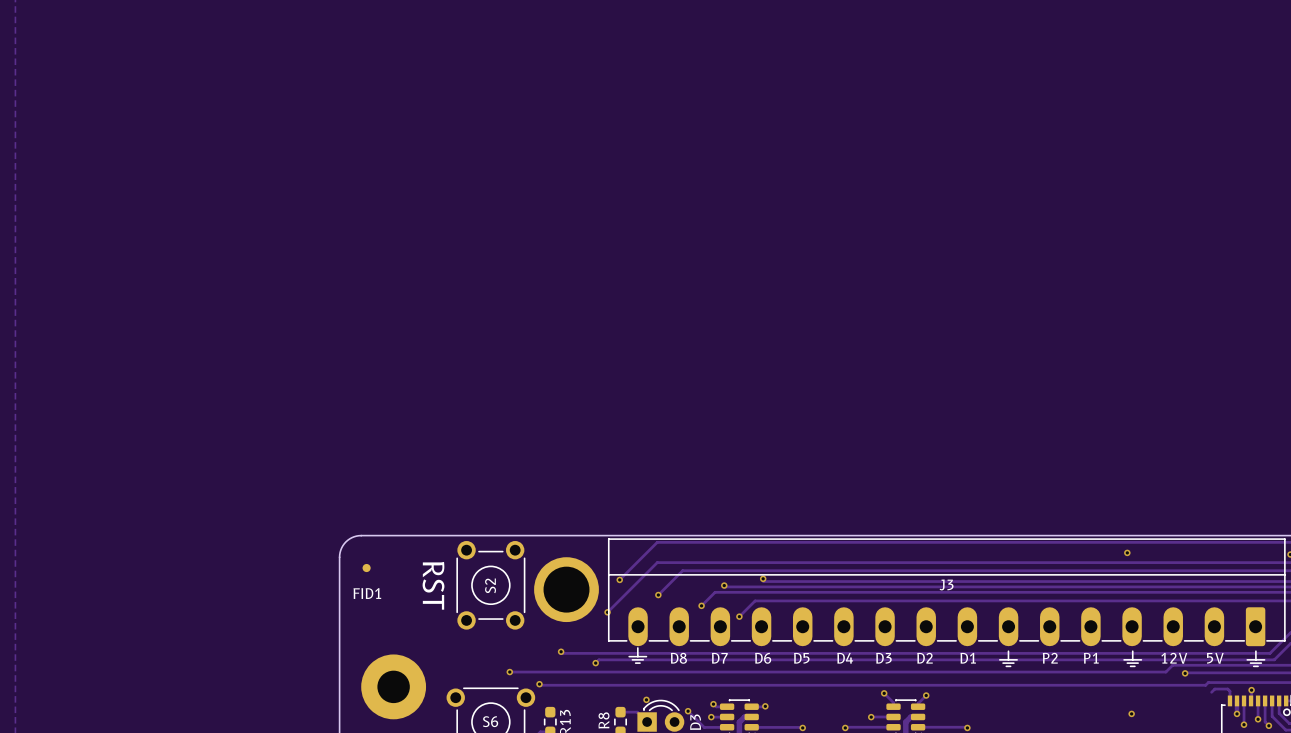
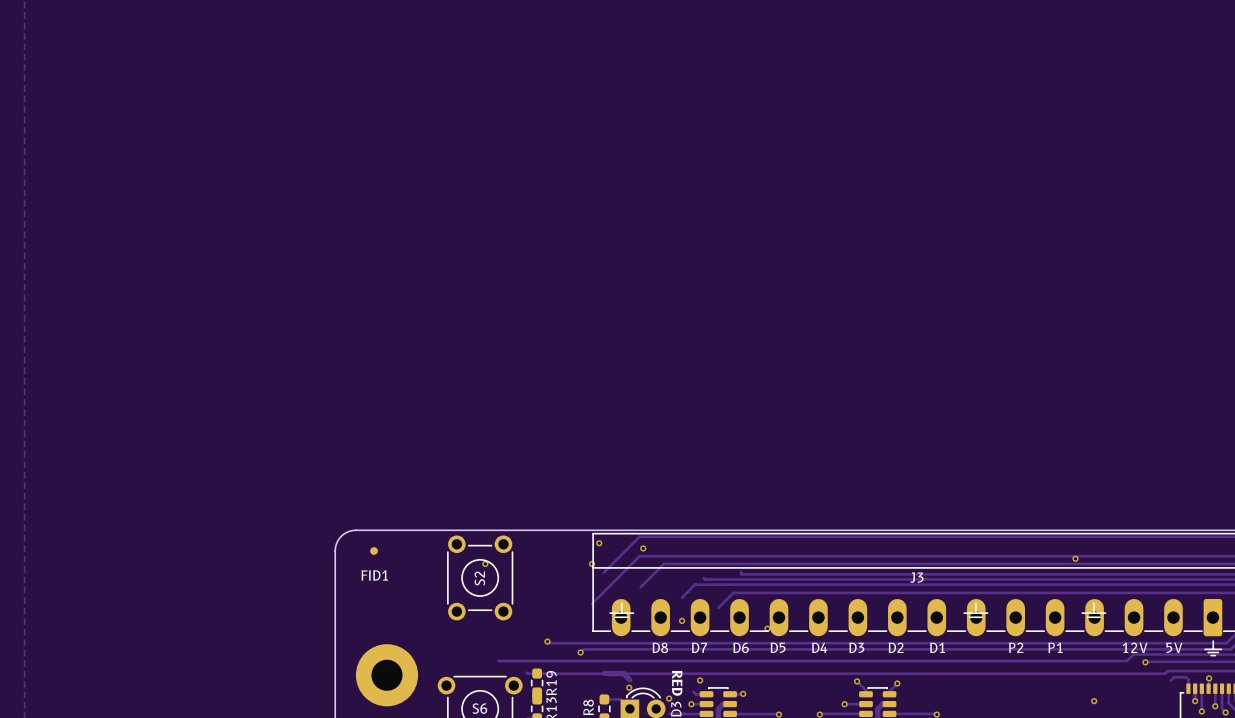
via: none -> (599, 543)
via position: (1127, 552) -> (1075, 558)
via: none -> (643, 548)
FID1 position: (366, 568) -> (374, 551)
via: none -> (485, 563)
via: (763, 578) -> none
via position: (619, 579) -> (592, 563)
text: RST (433, 585) -> none
via: (724, 585) -> none
part: (566, 589) -> none
via: (658, 595) -> none
via: (701, 605) -> none
line: none -> (621, 603) (621, 613)
line: none -> (975, 603) (975, 613)
line: none -> (1093, 603) (1093, 613)
via: (607, 612) -> none
via: (739, 616) -> none
line: none -> (610, 613) (633, 613)
line: none -> (964, 613) (987, 613)
line: none -> (1082, 613) (1105, 613)
line: none -> (615, 617) (628, 617)
line: none -> (969, 617) (982, 617)
line: none -> (1087, 617) (1100, 617)
via: none -> (682, 620)
via: none -> (767, 628)
line: (637, 647) (637, 656) -> none
line: (1008, 651) (1008, 659) -> none
line: (1132, 651) (1132, 659) -> none
line: (629, 656) (646, 656) -> none
line: (632, 659) (643, 659) -> none
line: (999, 659) (1017, 659) -> none
line: (1124, 659) (1141, 659) -> none
line: (635, 663) (639, 663) -> none
line: (1003, 663) (1013, 663) -> none
line: (1127, 663) (1138, 663) -> none
line: (1006, 666) (1010, 666) -> none
line: (1130, 666) (1134, 666) -> none
via: (509, 672) -> none
via: (539, 684) -> none
track: none -> (604, 673) (623, 673) (629, 679)
R19: none -> (537, 683)
text: none -> RED (677, 683)
via position: (713, 704) -> (700, 680)
track: (688, 711) (704, 727) -> (669, 713) (684, 713)

